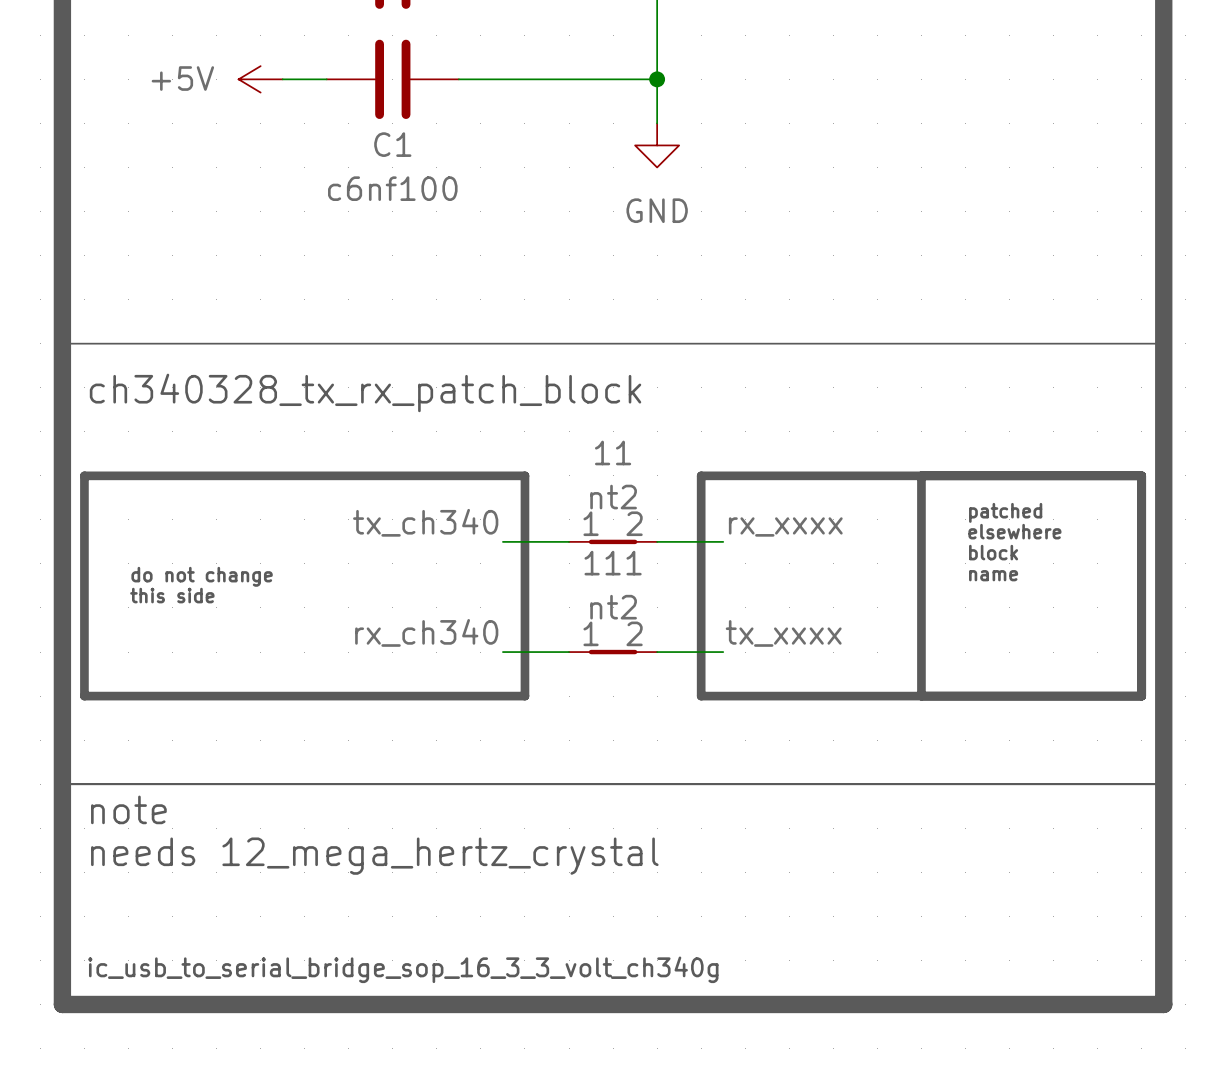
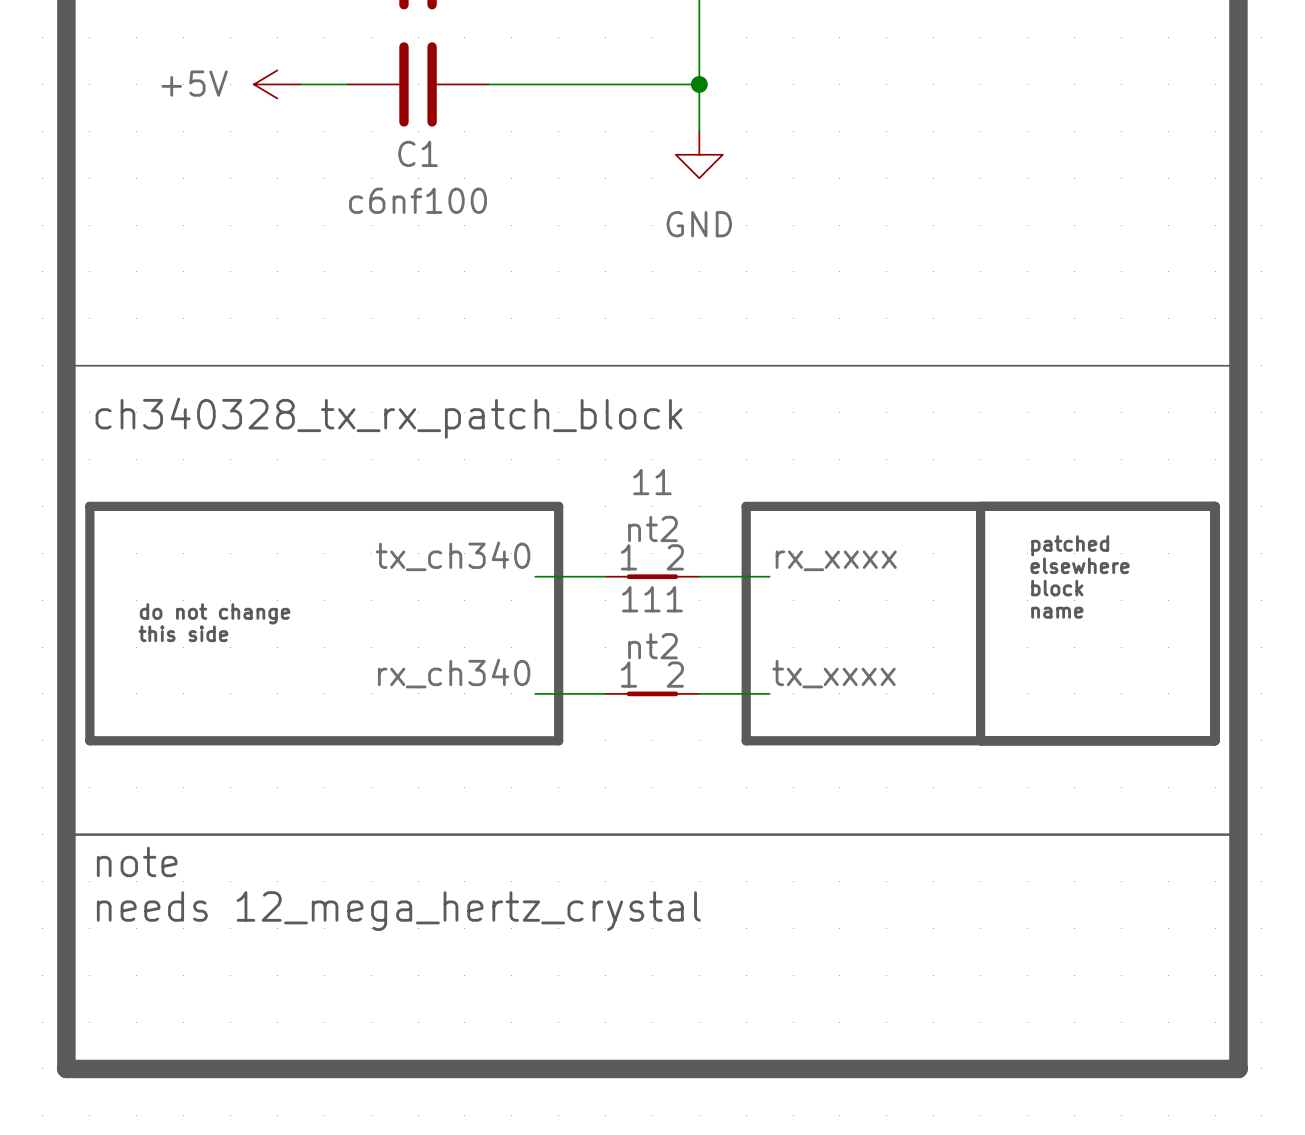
text: ic_usb_to_serial_bridge_sop_16_3_3_volt_ch340g (403, 969) -> none

